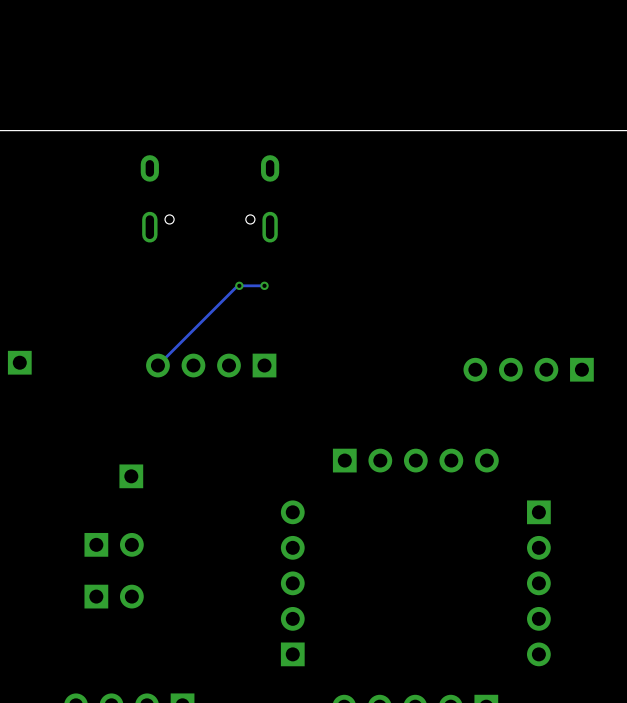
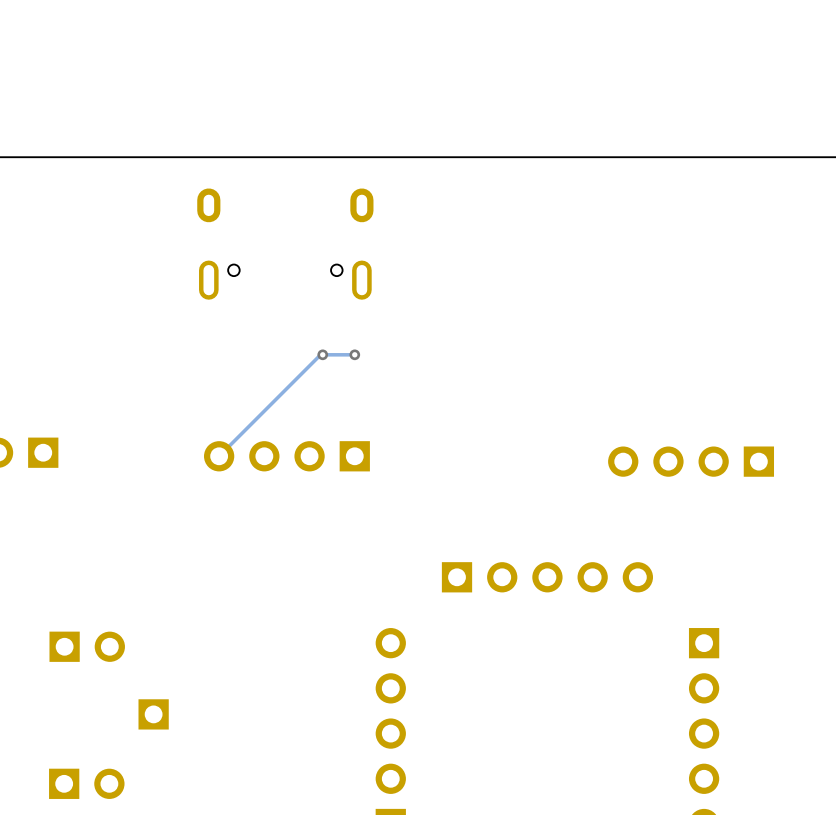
part position: (131, 476) -> (153, 714)
part: none -> (87, 646)
part: (114, 544) -> none
part: (114, 596) -> none
part: none -> (86, 783)

